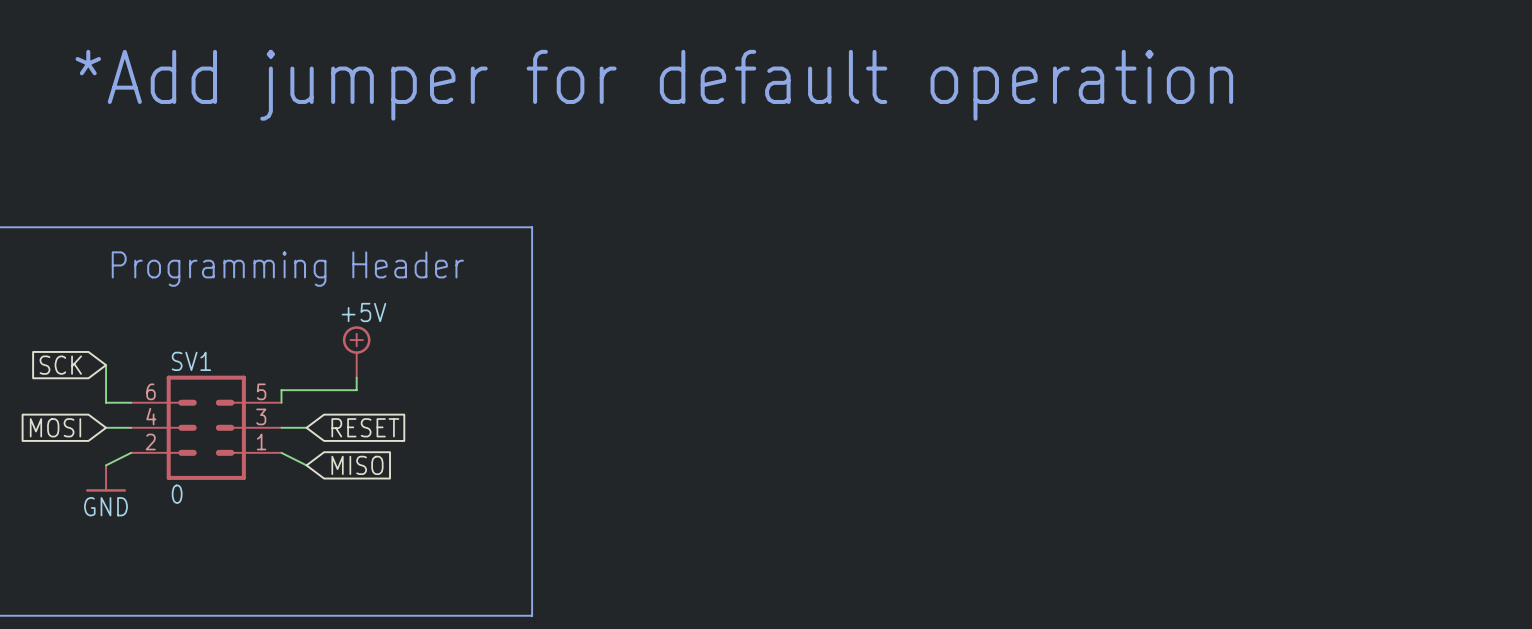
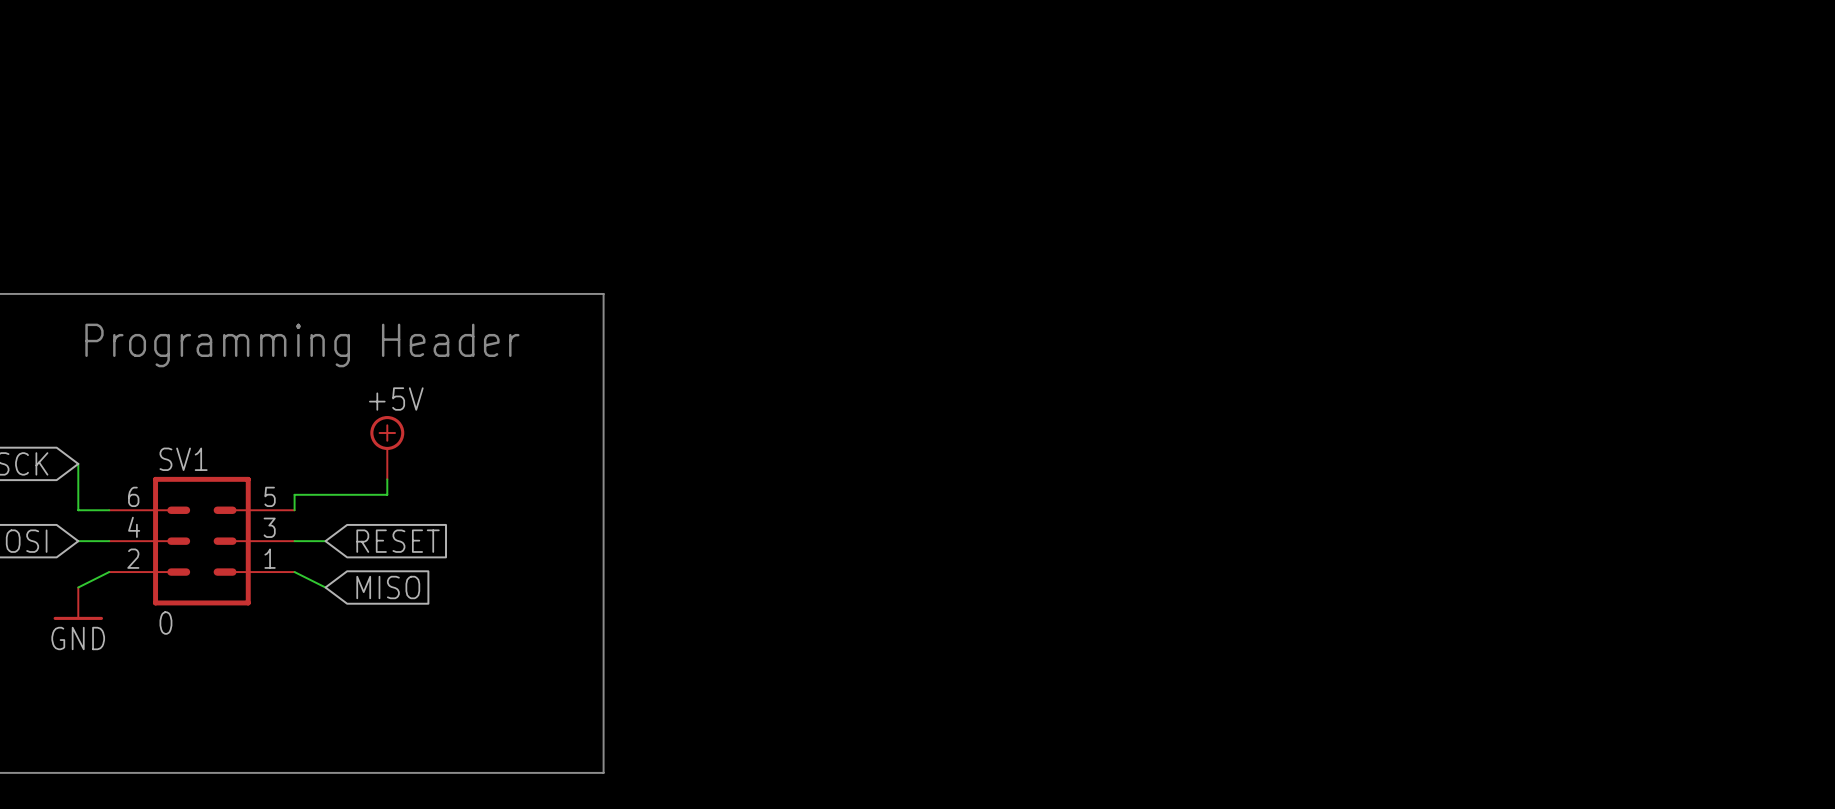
text: *Add jumper for default operation (654, 85) -> none

